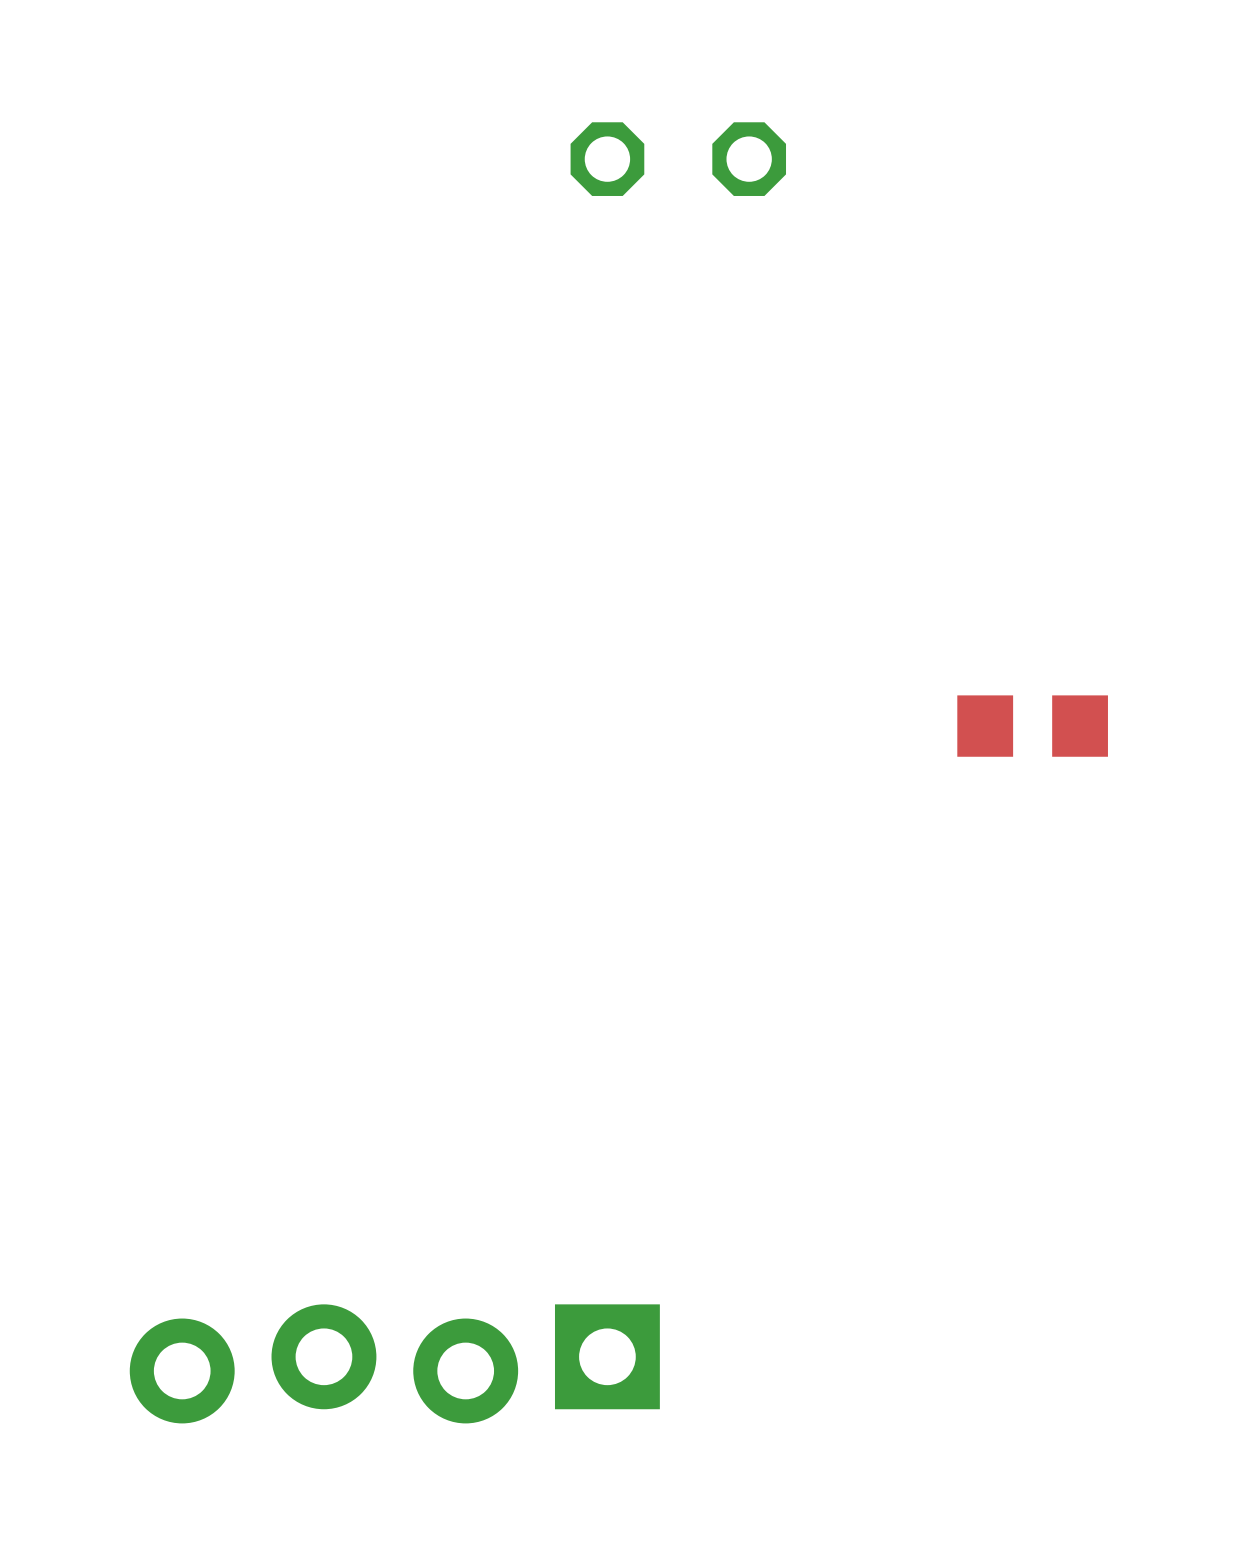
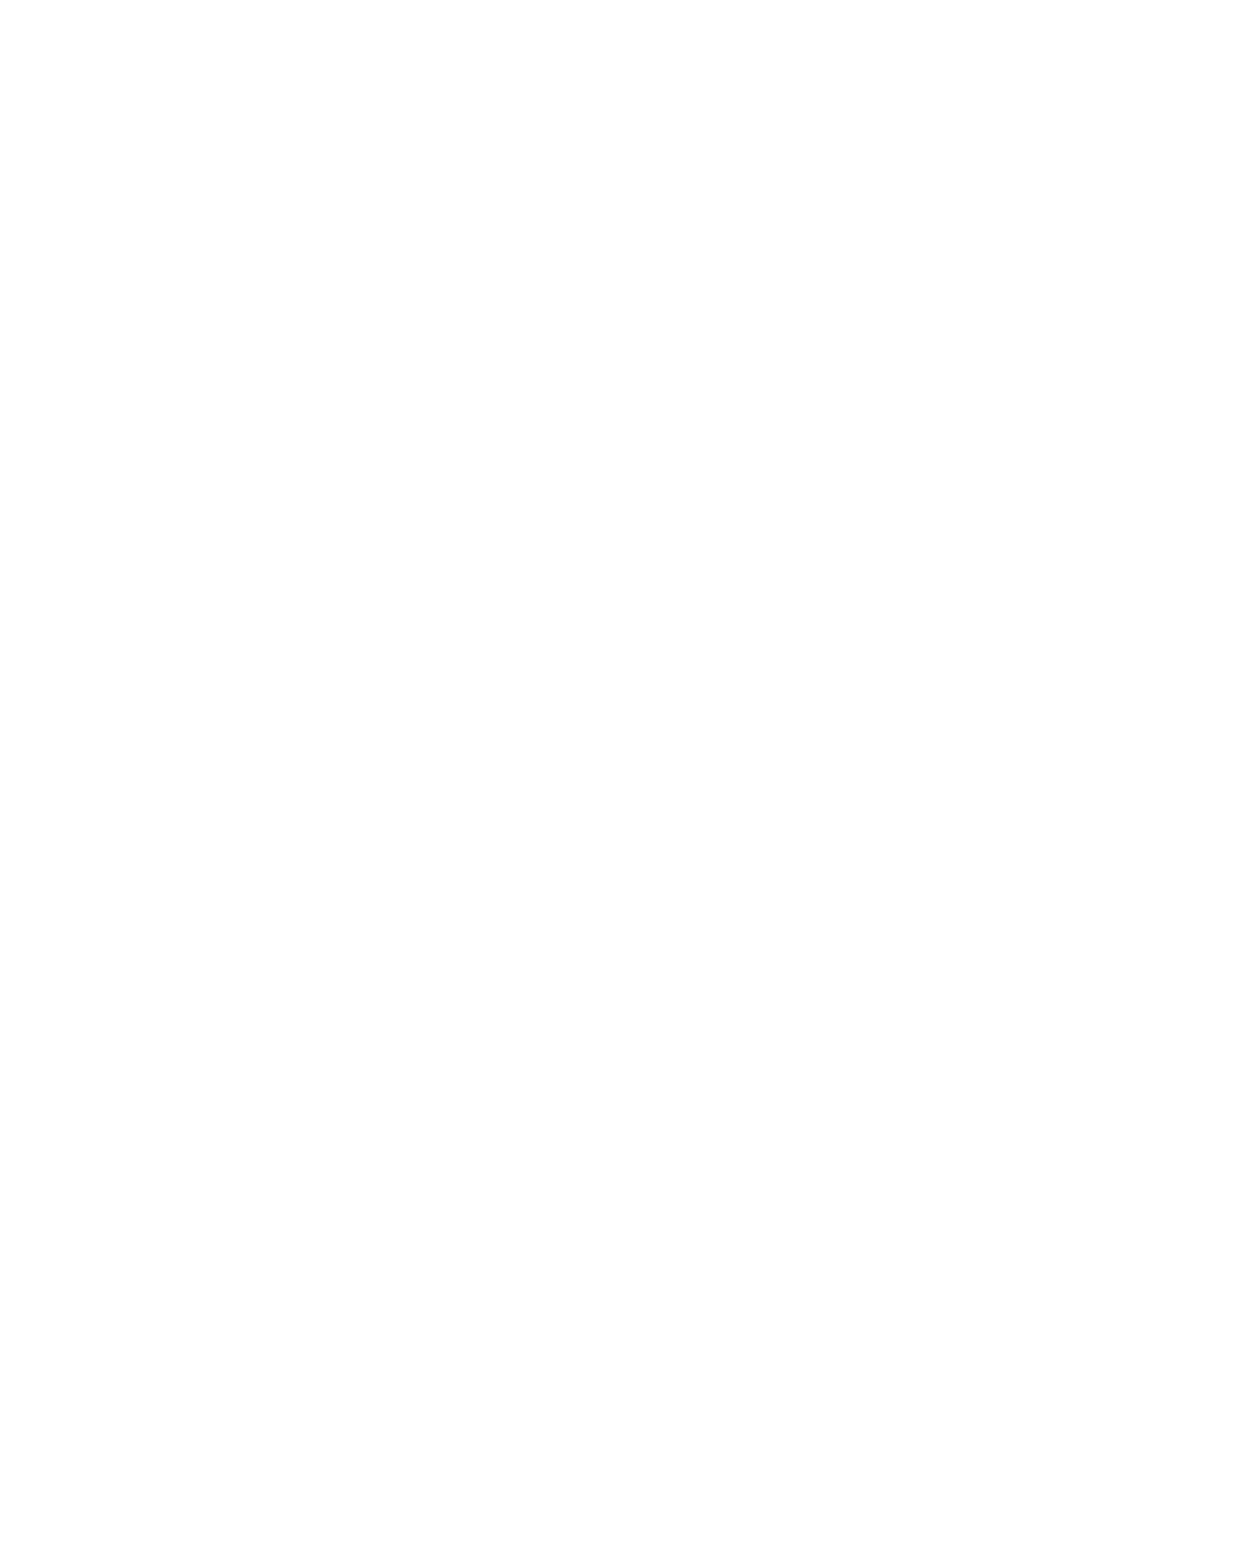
part: (678, 159) -> none
part: (1032, 726) -> none
part: (394, 1363) -> none

